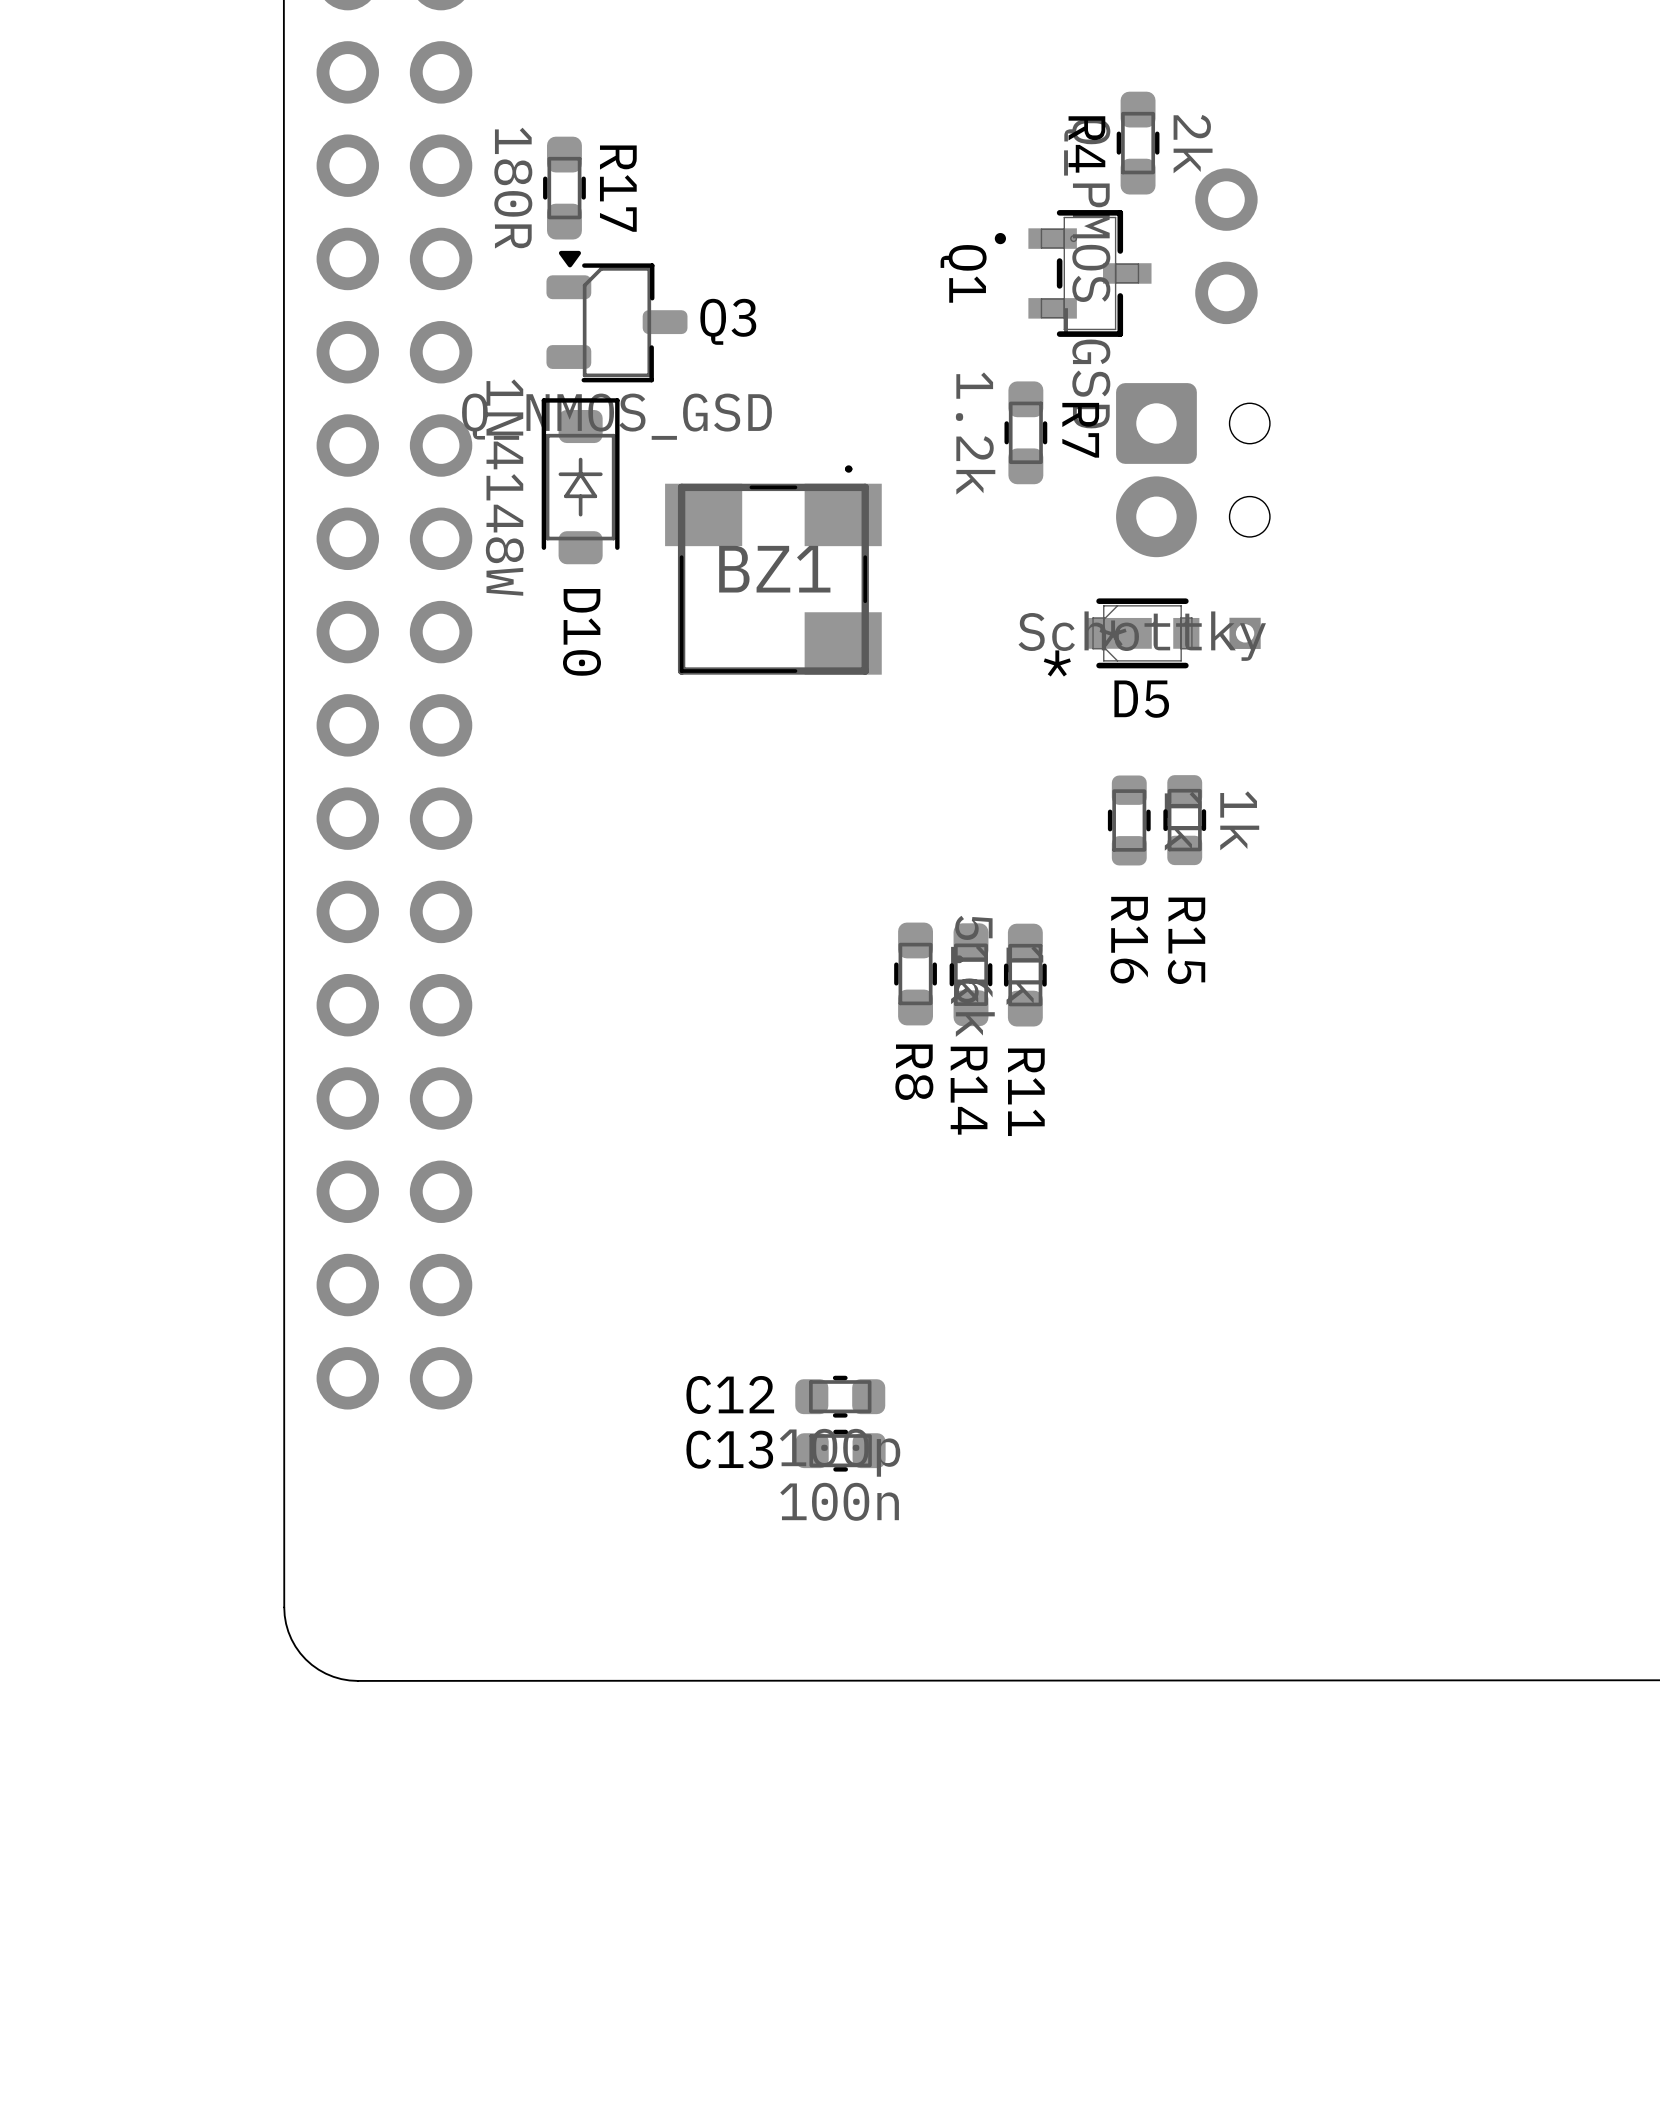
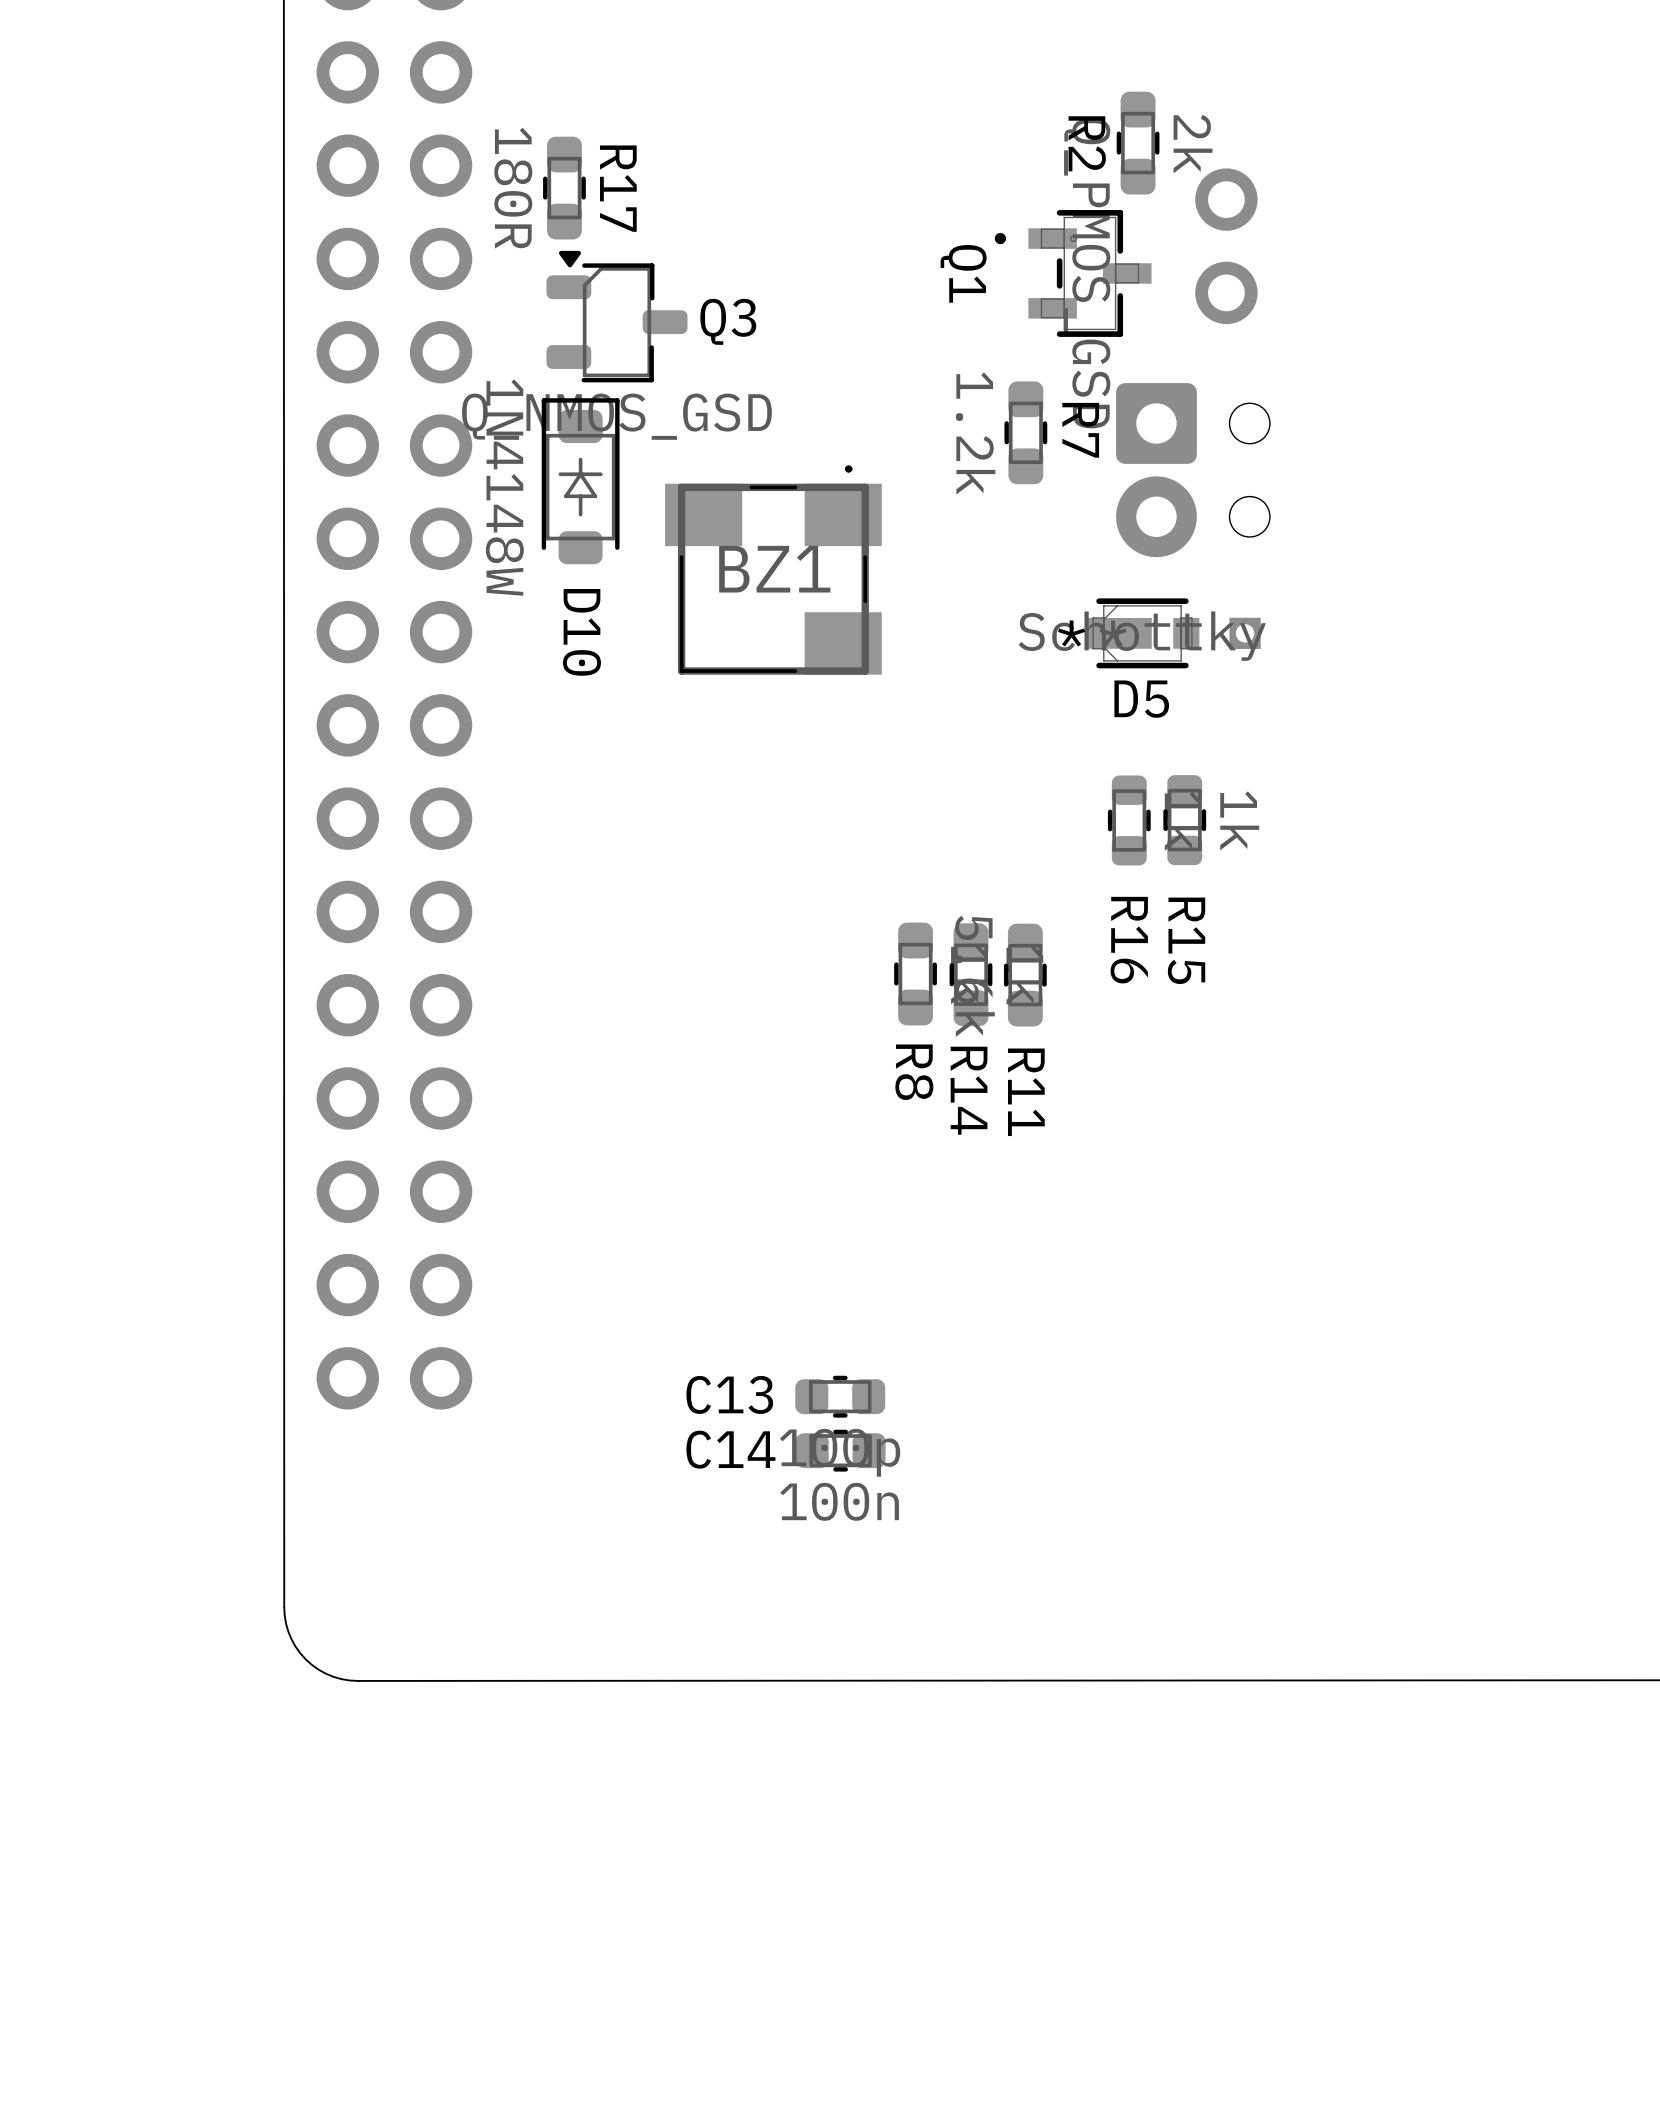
R4 name: R4 (1086, 144) -> R2 (1087, 143)
D5 text position: * (1057, 663) -> * (1071, 633)
C12 name: C12 (730, 1394) -> C13 (729, 1394)
C13 name: C13 (729, 1449) -> C14 (730, 1449)

